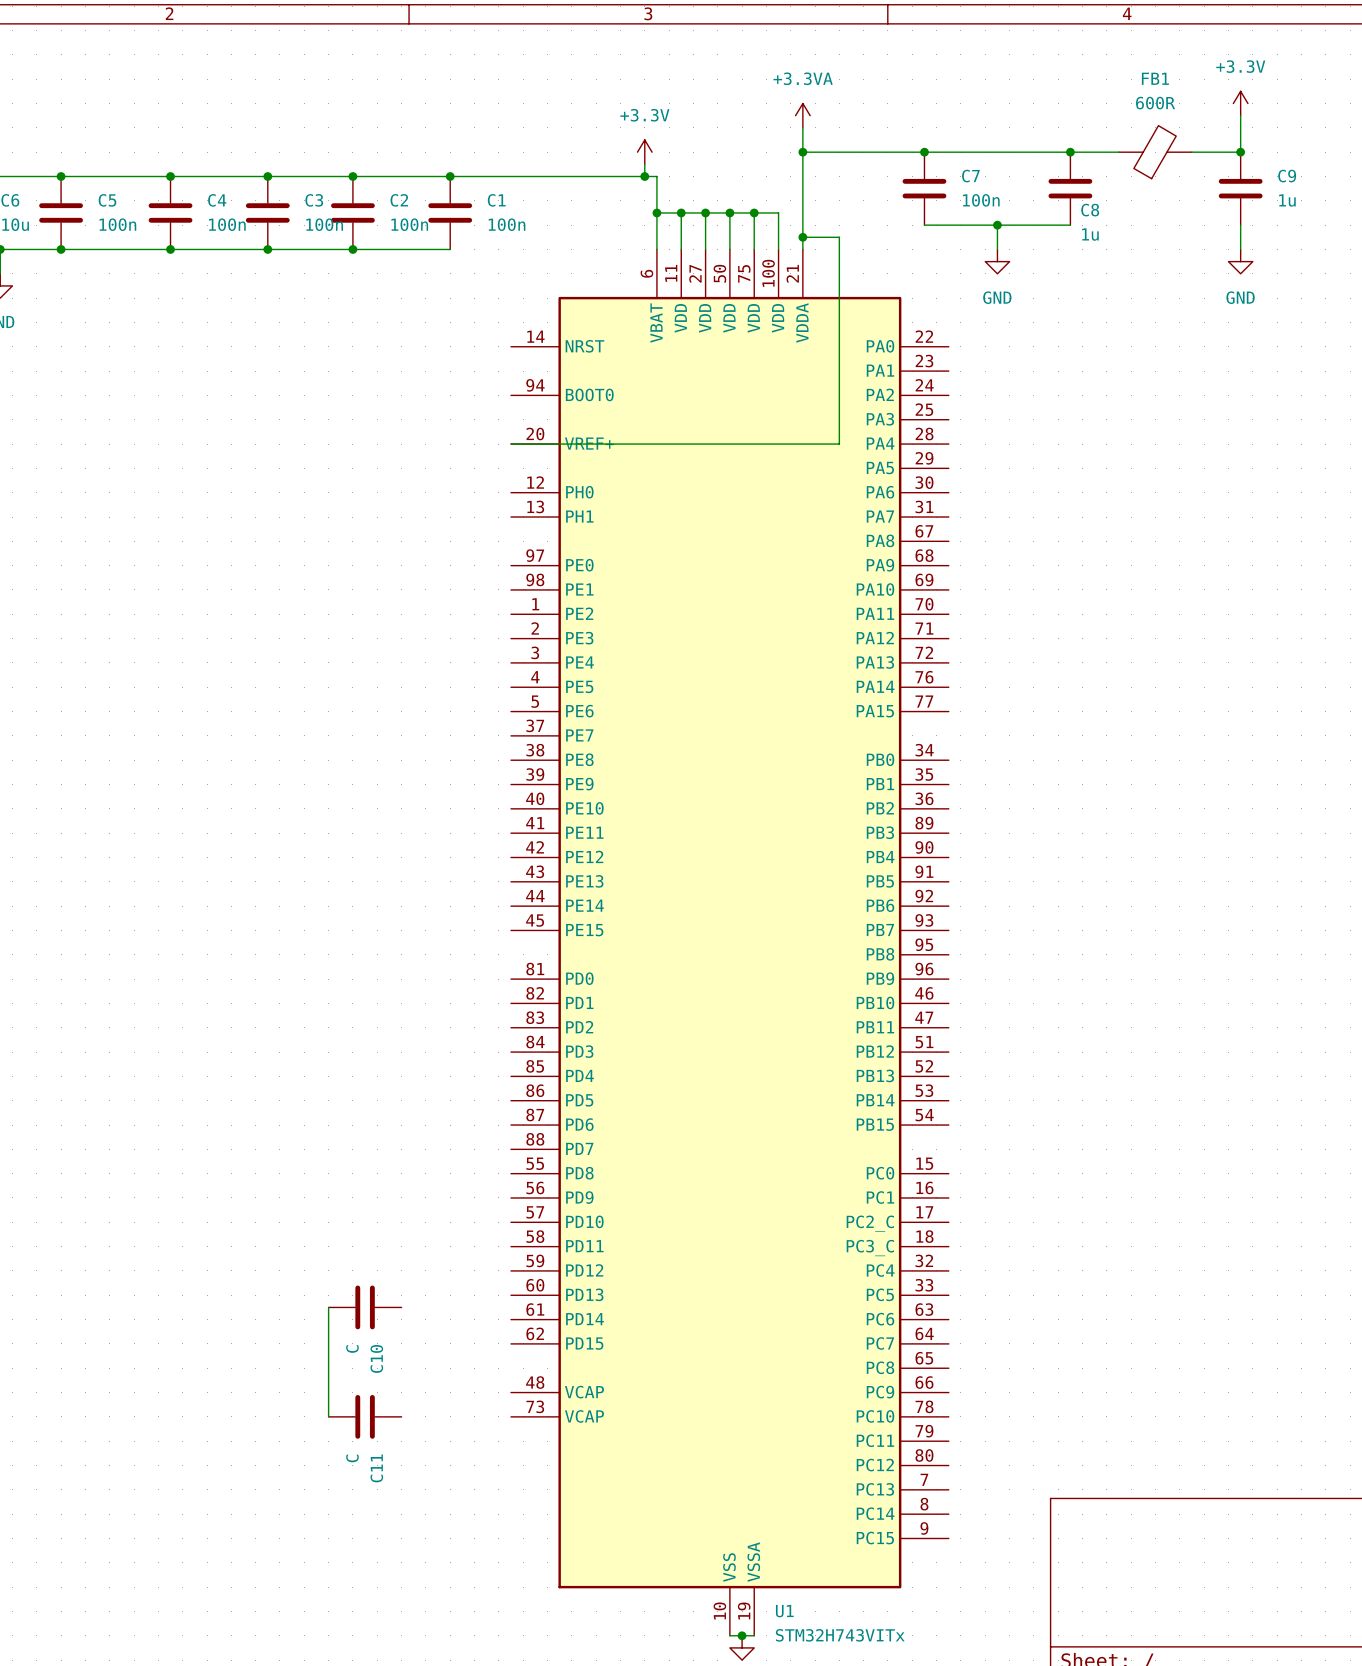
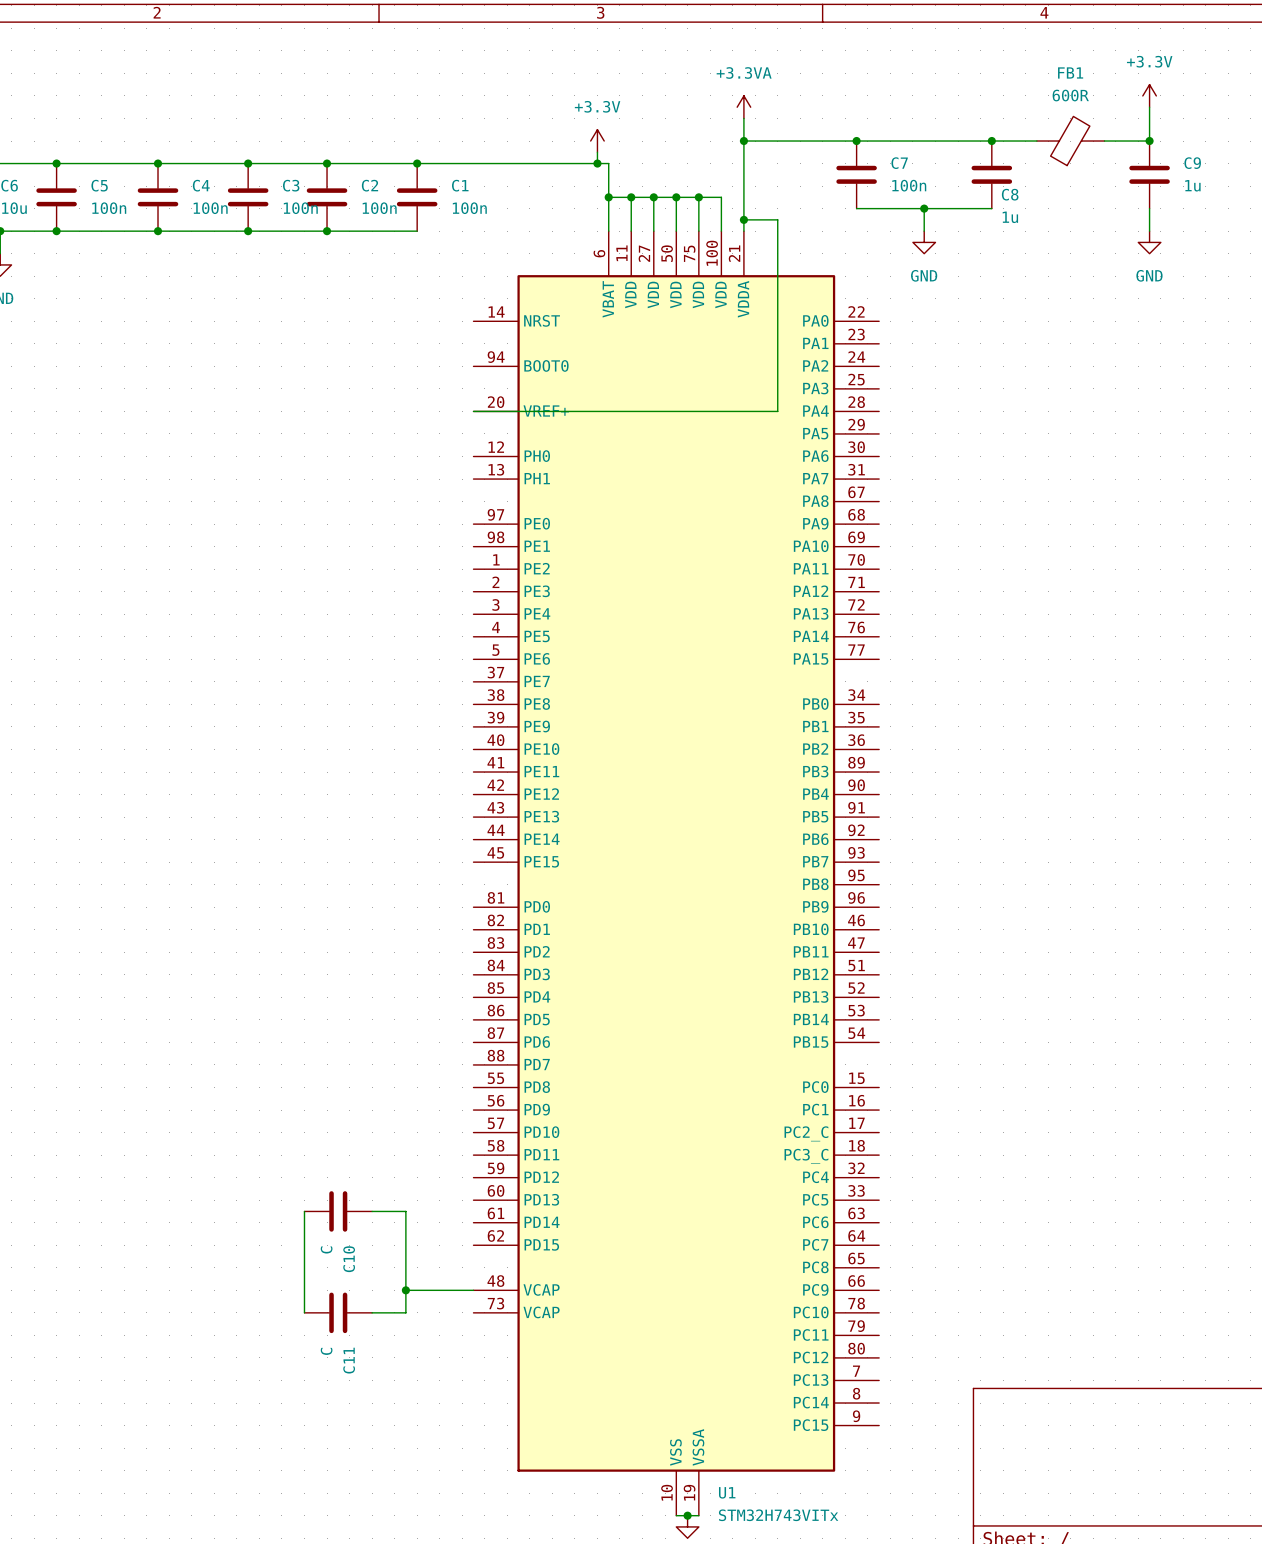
wire: none -> (372, 1211) (405, 1211) (405, 1312) (372, 1312)
wire: none -> (405, 1290) (473, 1290)
junction: none -> (405, 1290)

